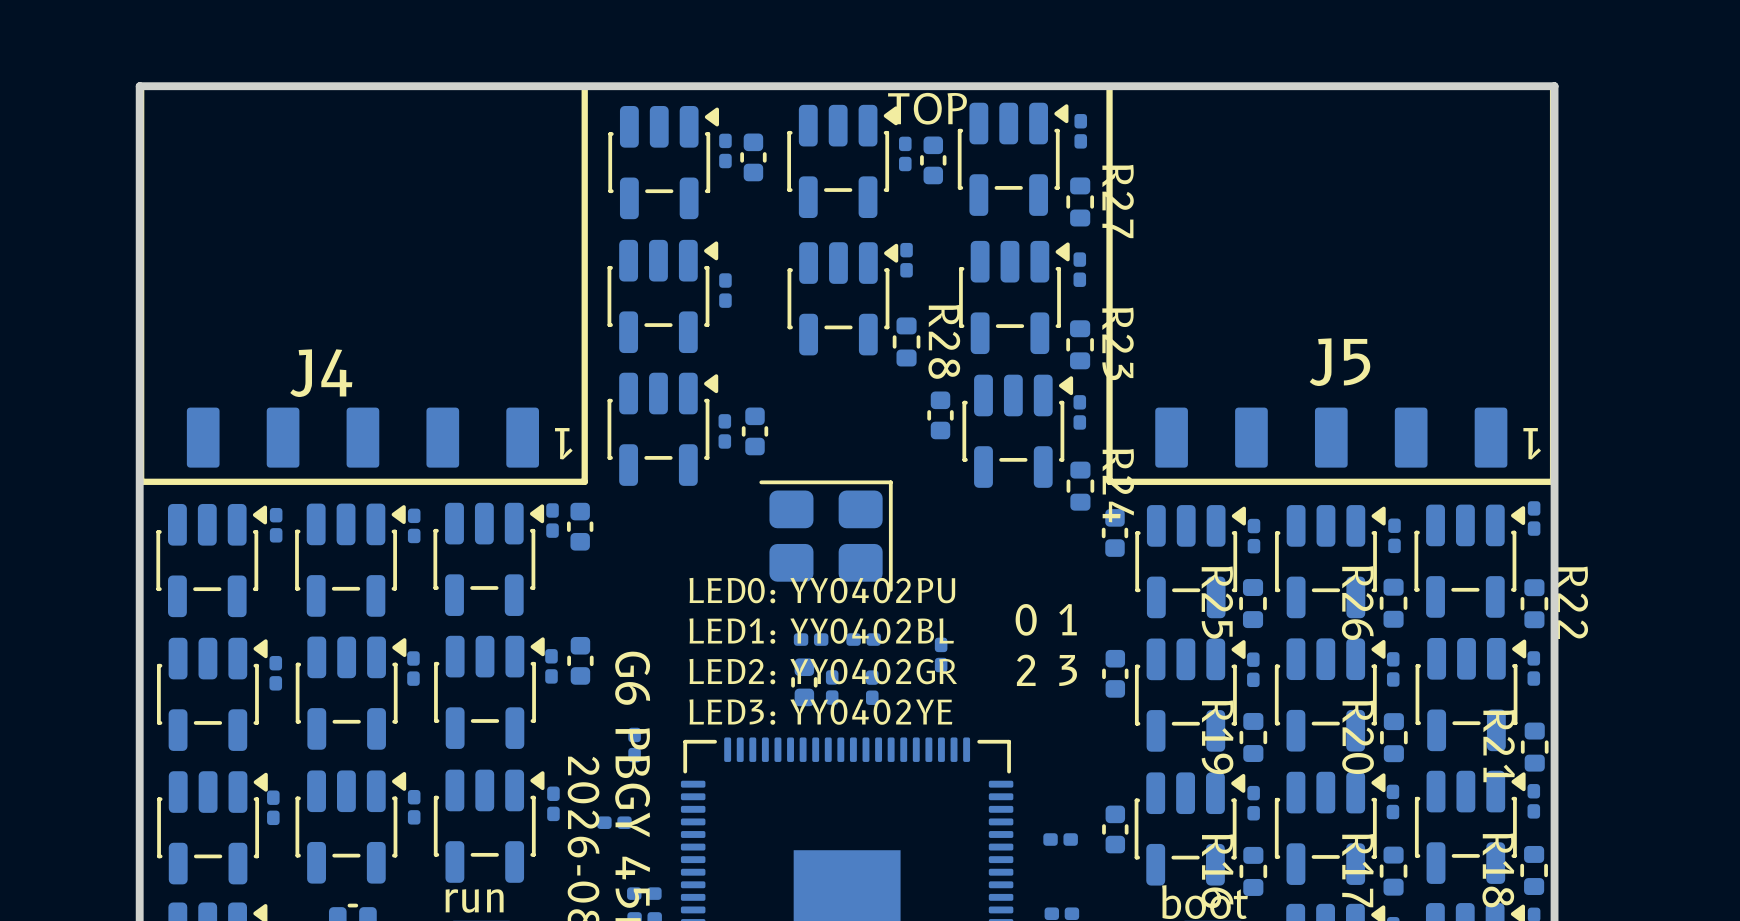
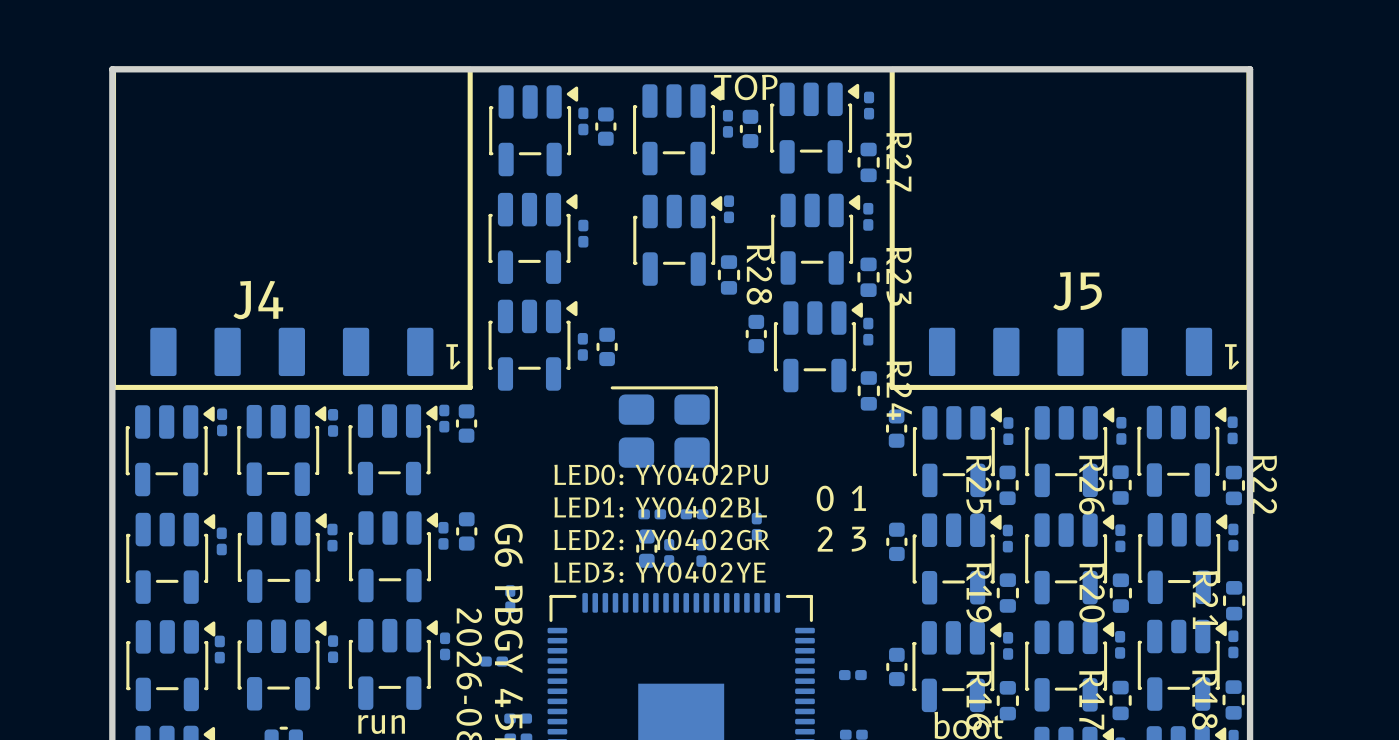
part position: (1534, 518) -> (1232, 430)

